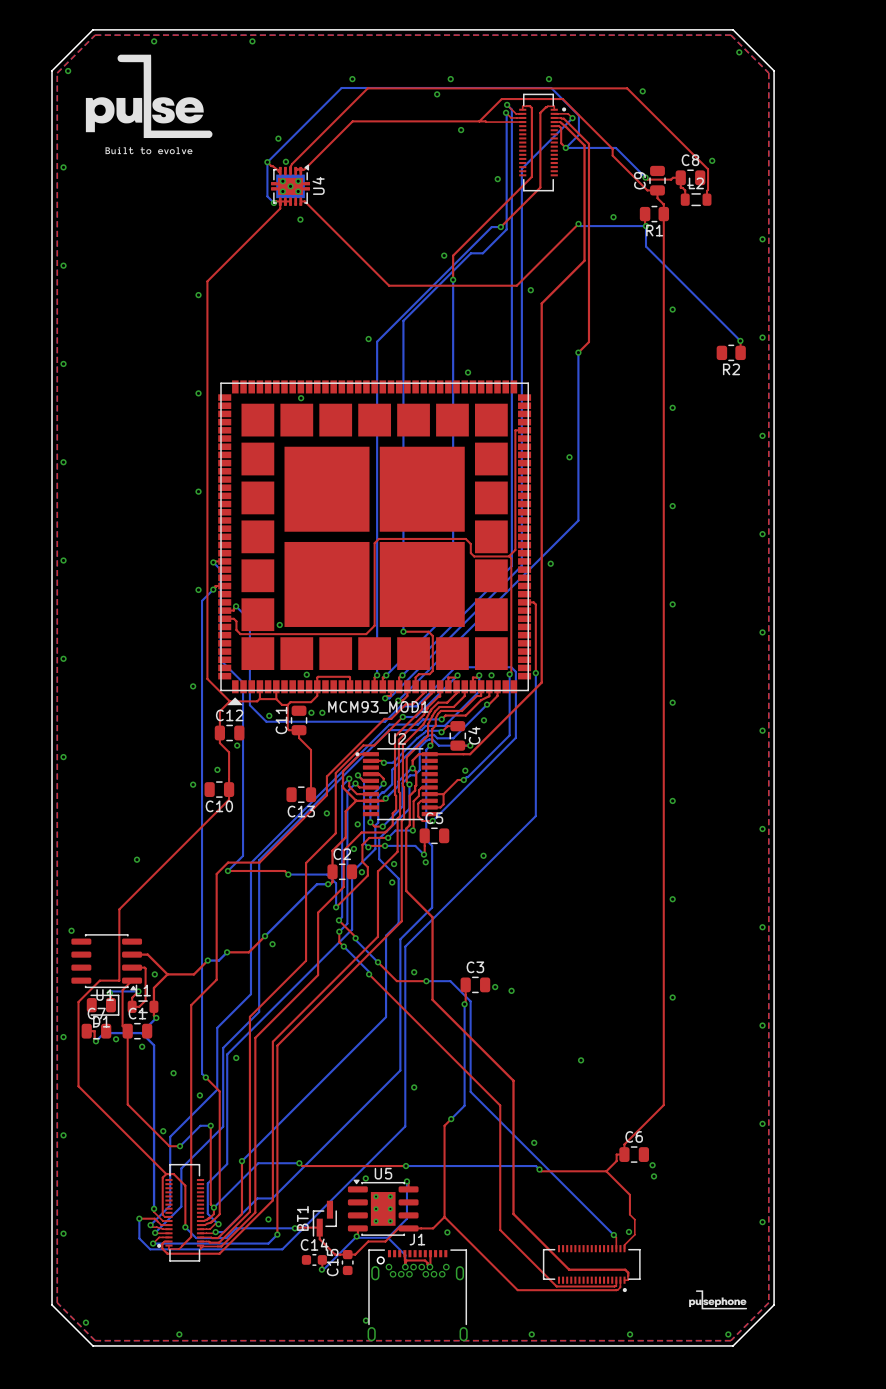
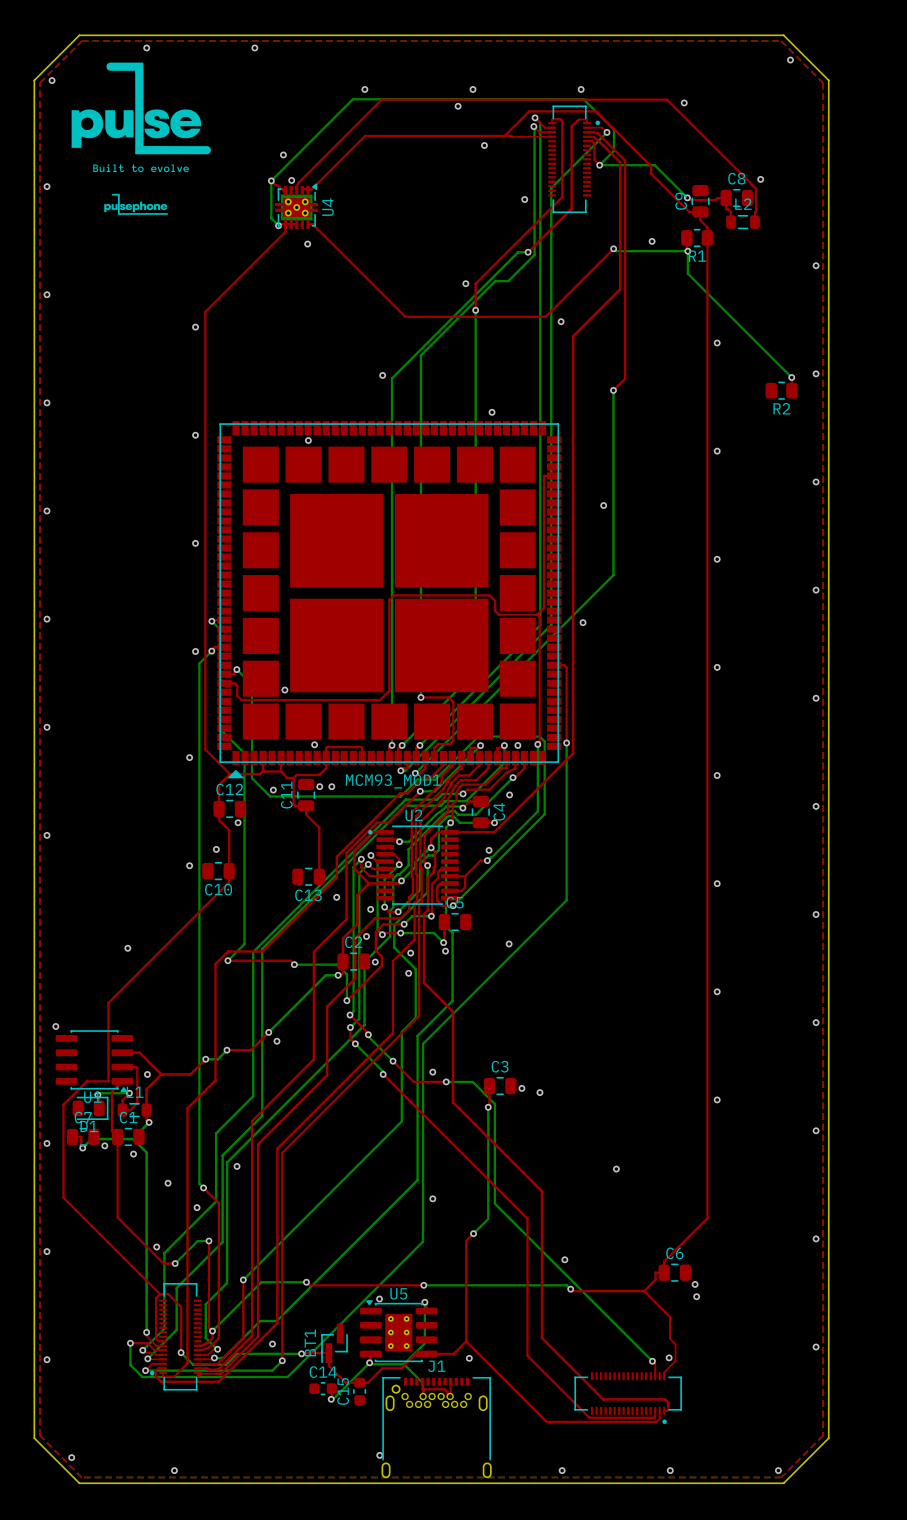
drawing: none -> [104, 193, 168, 215]
drawing: [689, 1290, 747, 1310] -> none

